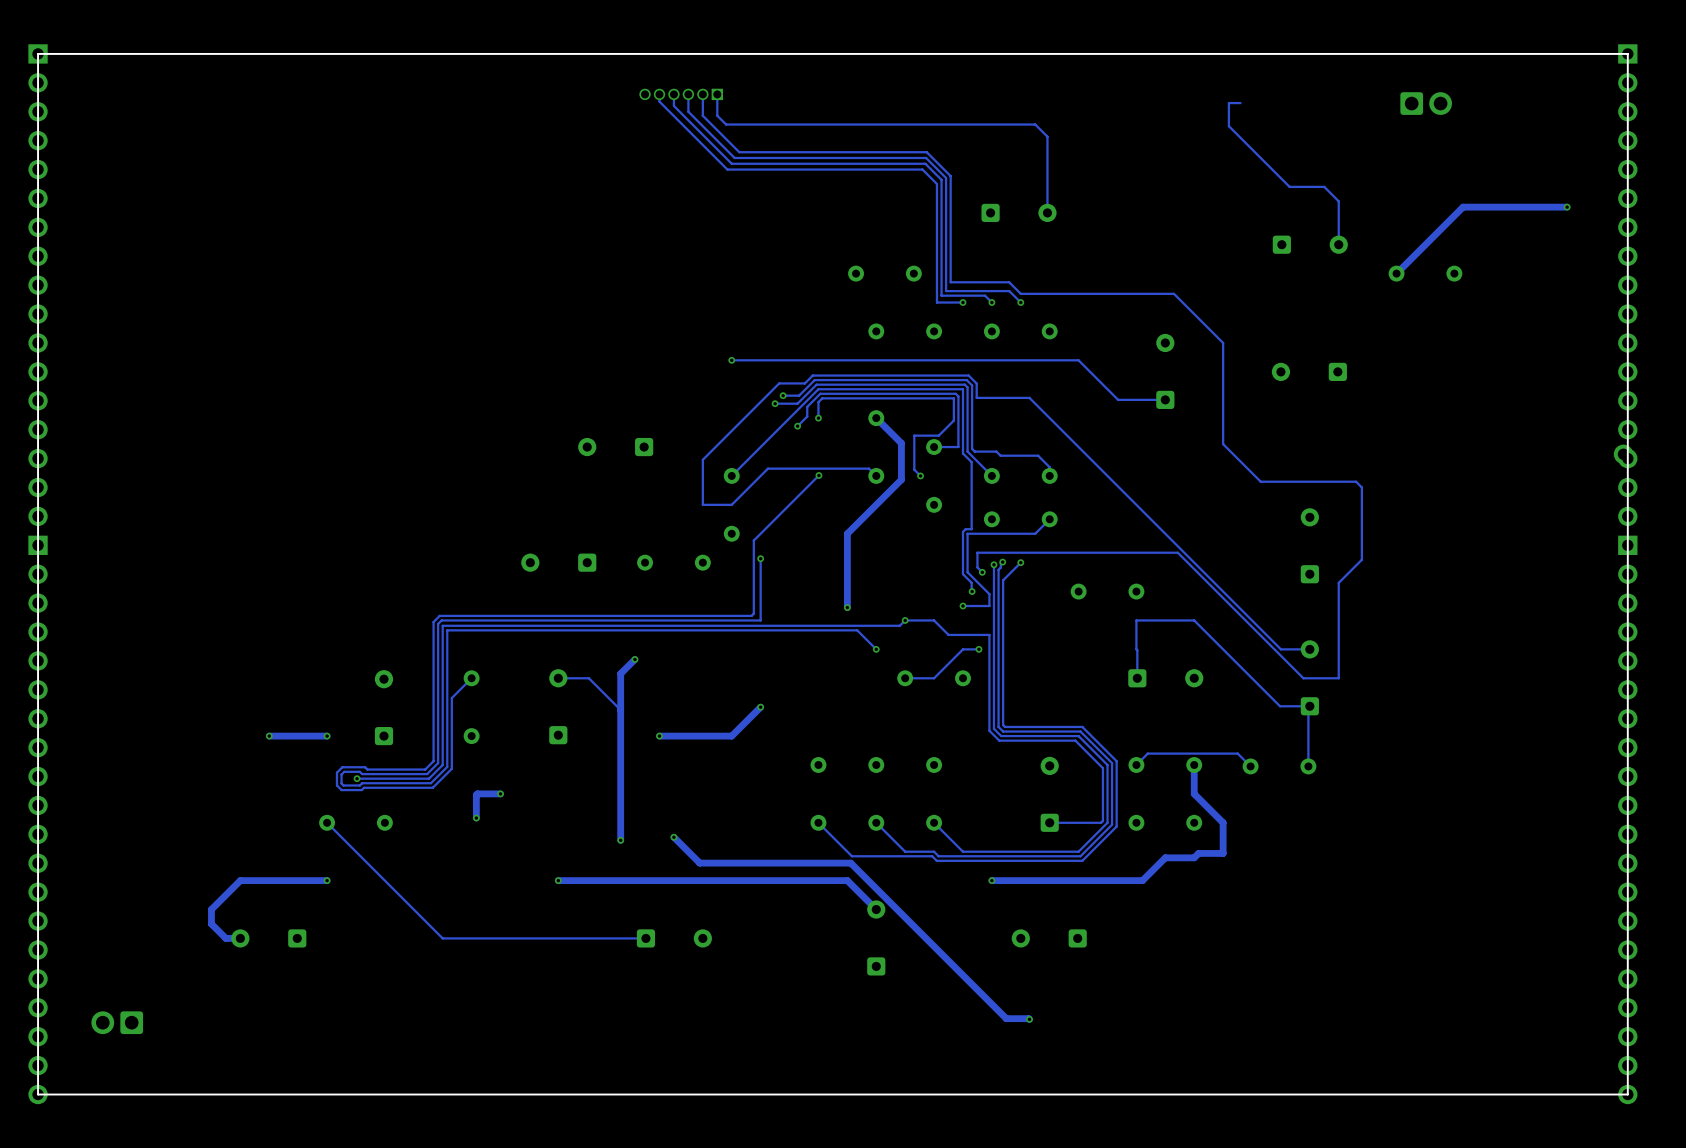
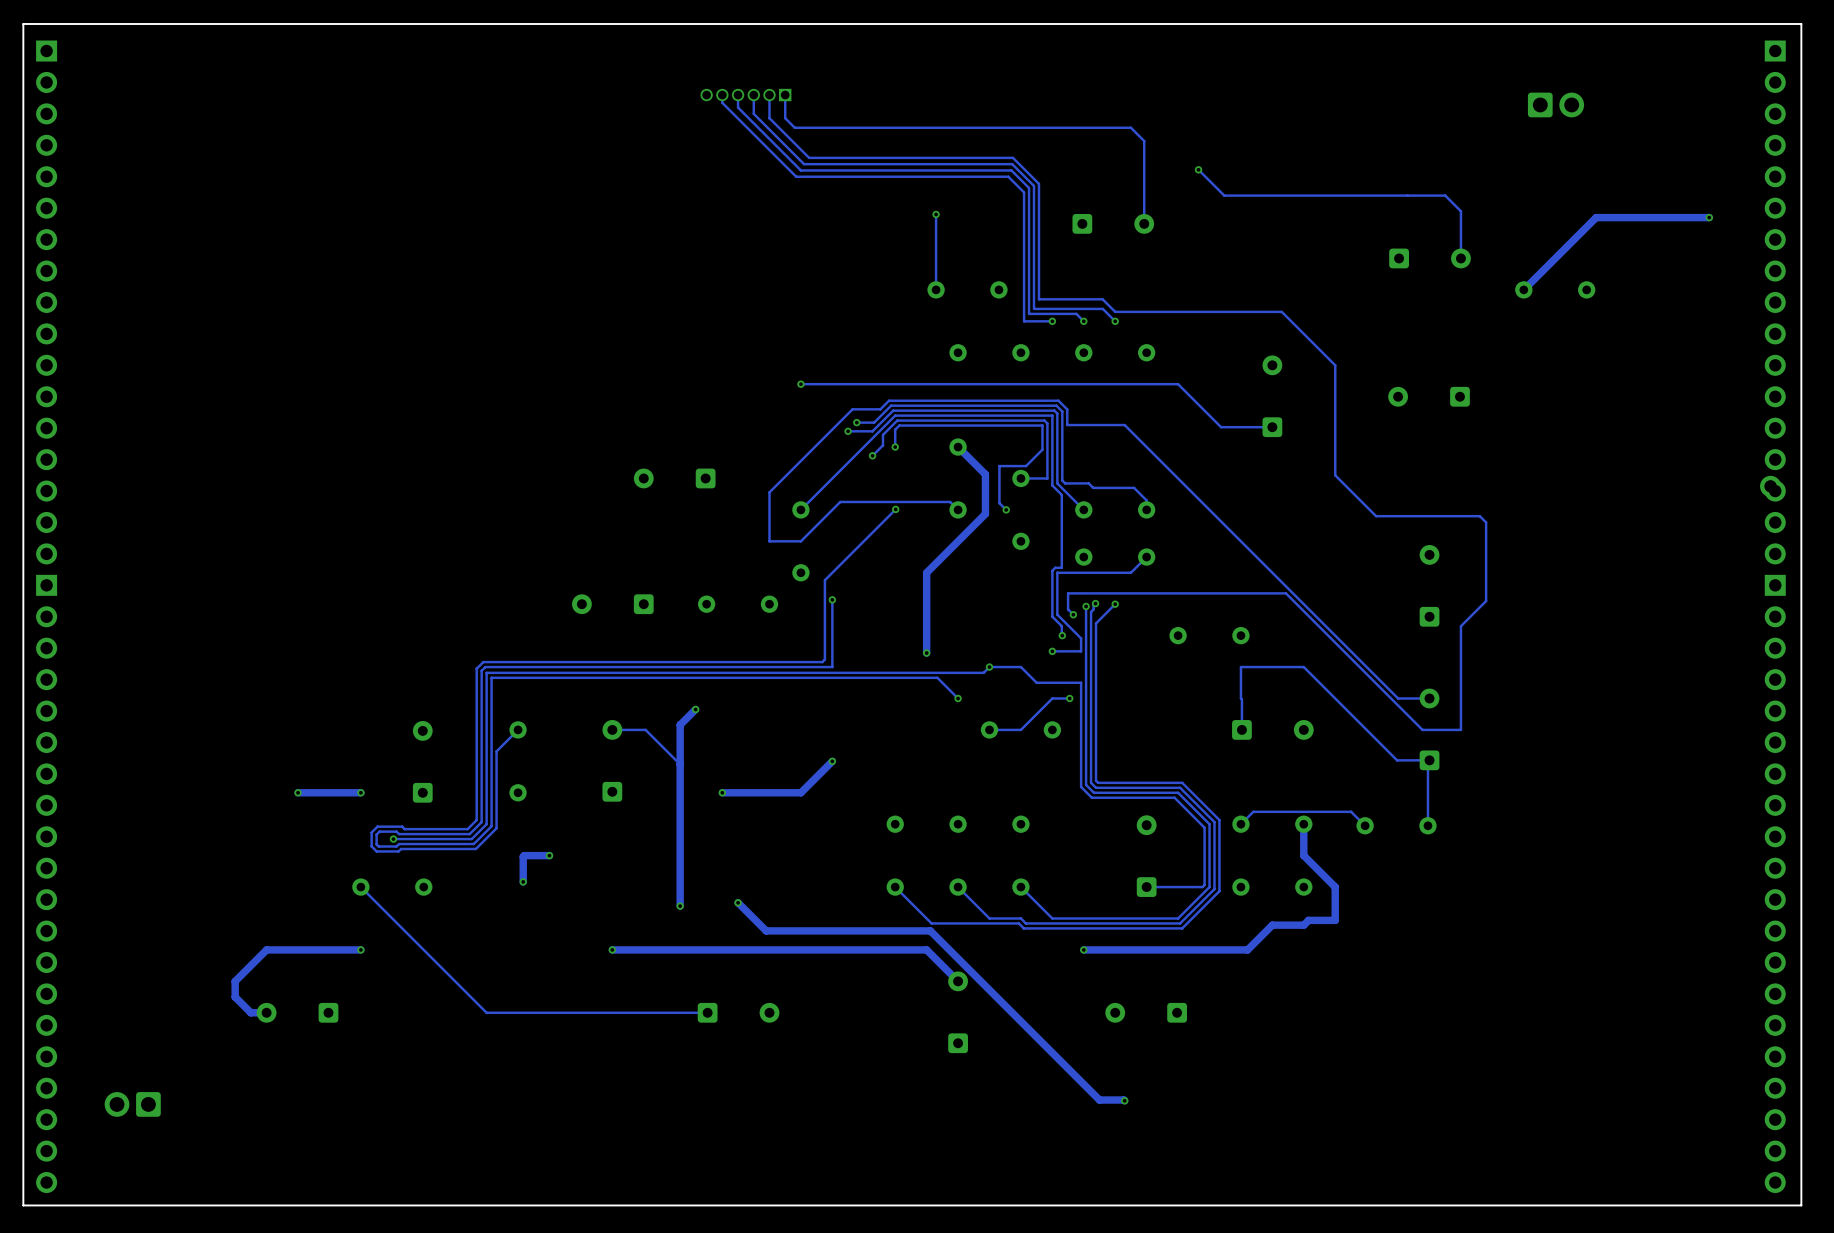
board edge: (1627, 53) (38, 53) (38, 1094) (1627, 1094) (1627, 53) -> (1801, 23) (1801, 1205) (23, 1205) (23, 23) (1801, 23)
track: (1240, 103) (1228, 103) (1228, 126) (1289, 186) -> (1198, 169) (1224, 195) (1407, 195)
via: none -> (1198, 169)
track: none -> (936, 214) (936, 289)
via: none -> (936, 214)

